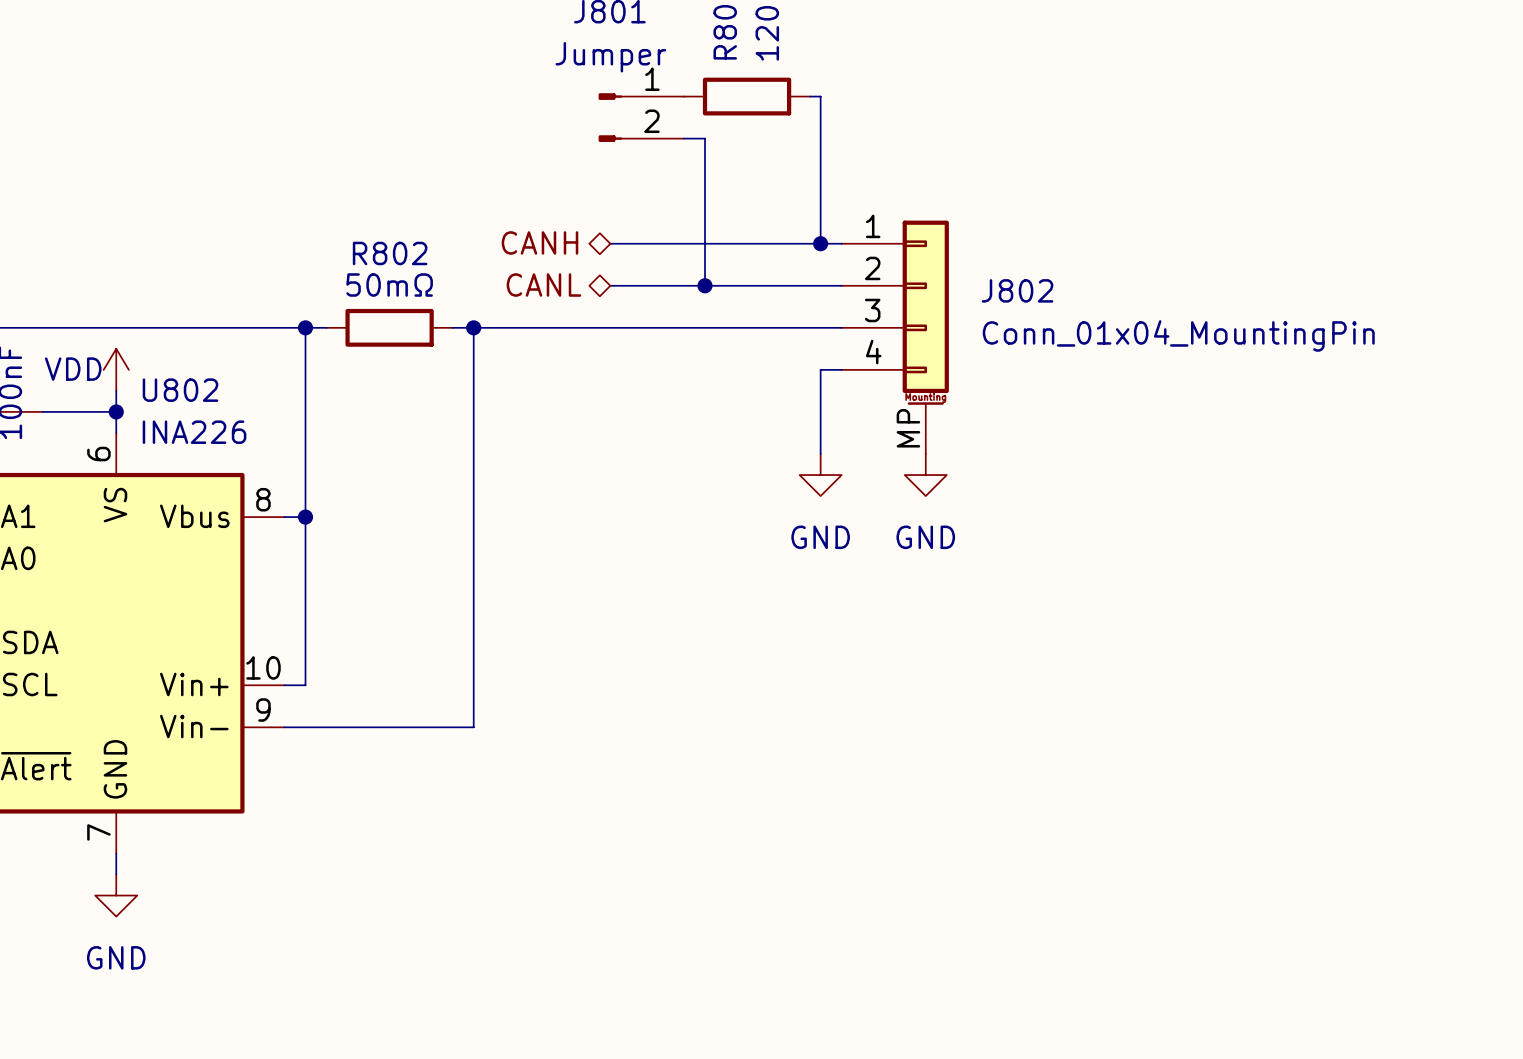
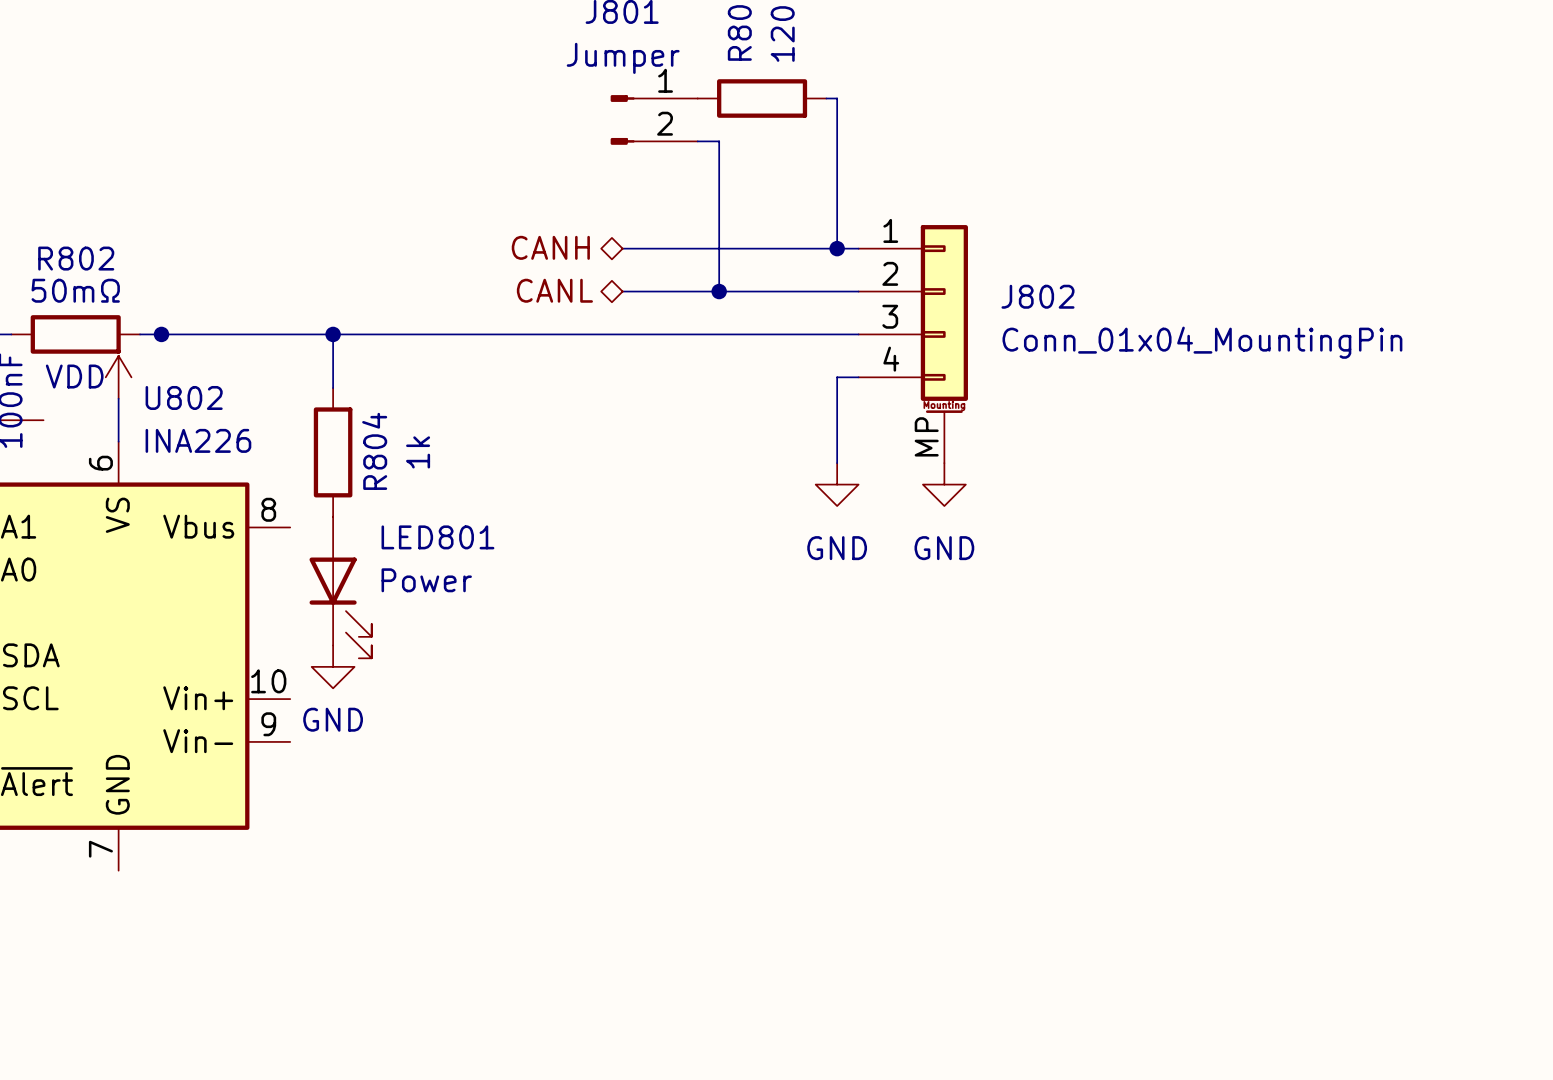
wire: (11, 327) (137, 327) -> none
junction: none -> (161, 334)
wire: (305, 327) (305, 685) (284, 685) -> none
junction position: (305, 327) -> (333, 334)
R802 position: (389, 327) -> (75, 334)
wire: none -> (461, 334) (333, 334) (333, 388)
wire: (473, 327) (473, 727) (284, 727) -> none
junction: (473, 327) -> none
wire: (42, 411) (116, 411) -> none
junction: (116, 411) -> none
R804: none -> 1k (333, 452)
wire: (284, 517) (305, 517) -> none
junction: (305, 517) -> none
LED801: none -> Power (340, 587)
power symbol: none -> GND (333, 666)
wire: (116, 853) (116, 874) -> none
power symbol: GND (116, 895) -> none

